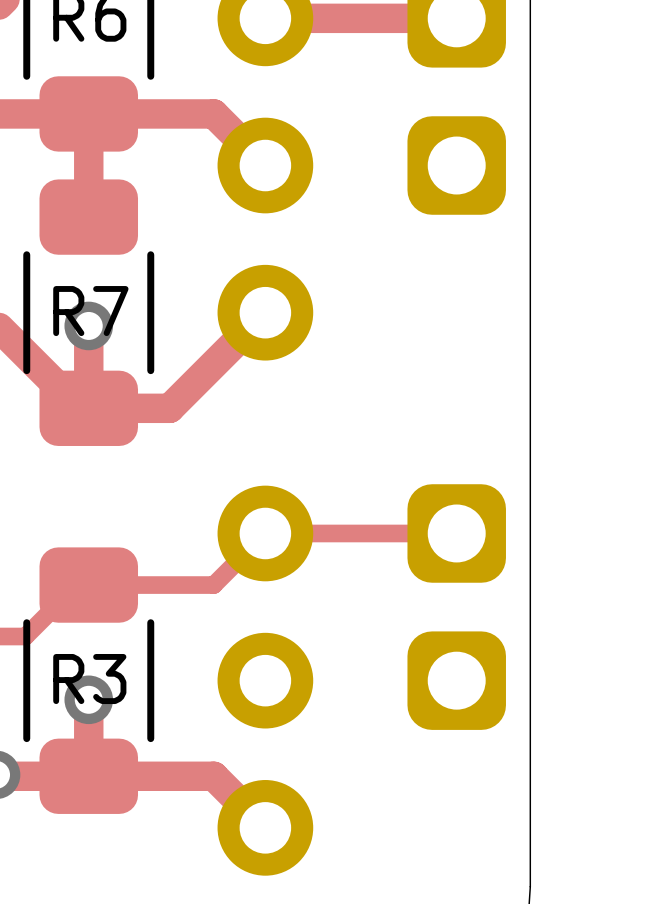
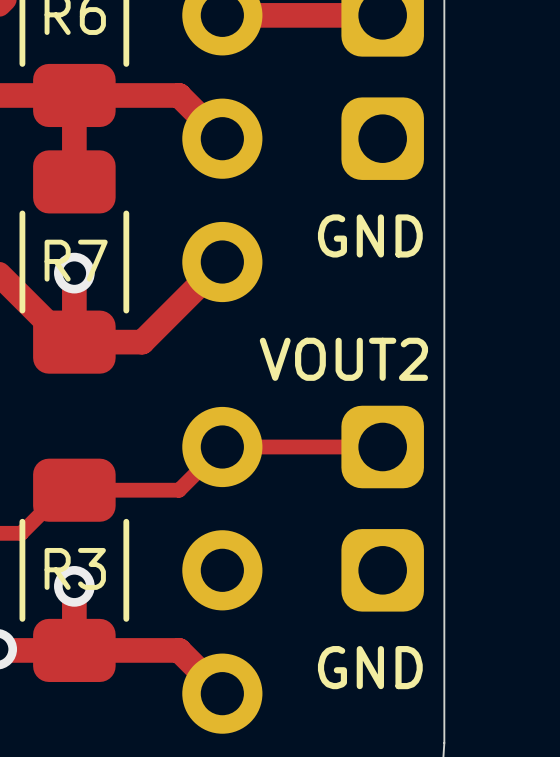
text: none -> GND (370, 235)
text: none -> VOUT2 (343, 359)
text: none -> GND (370, 667)

